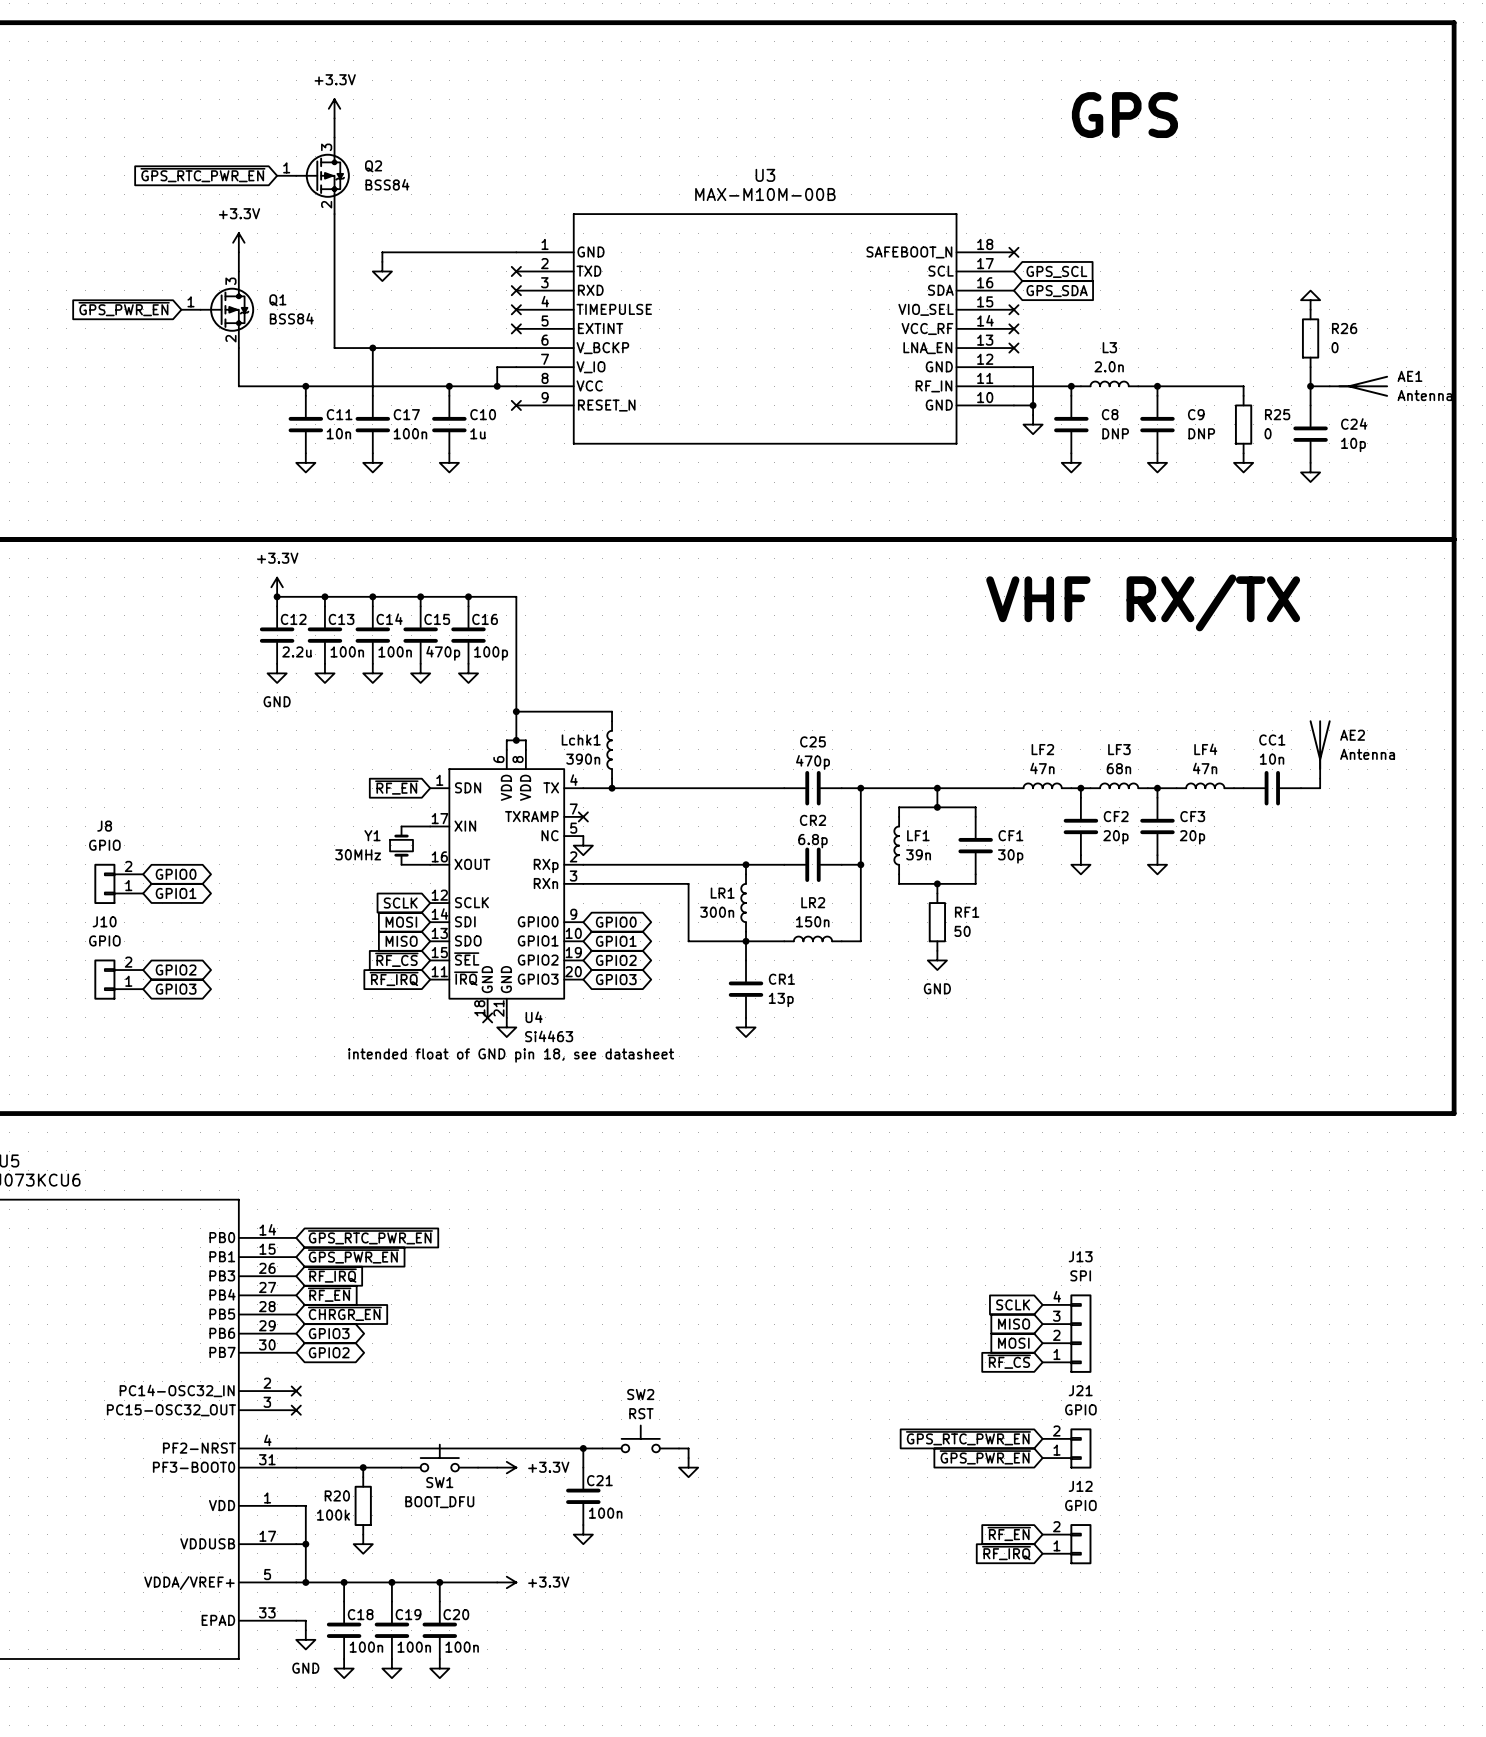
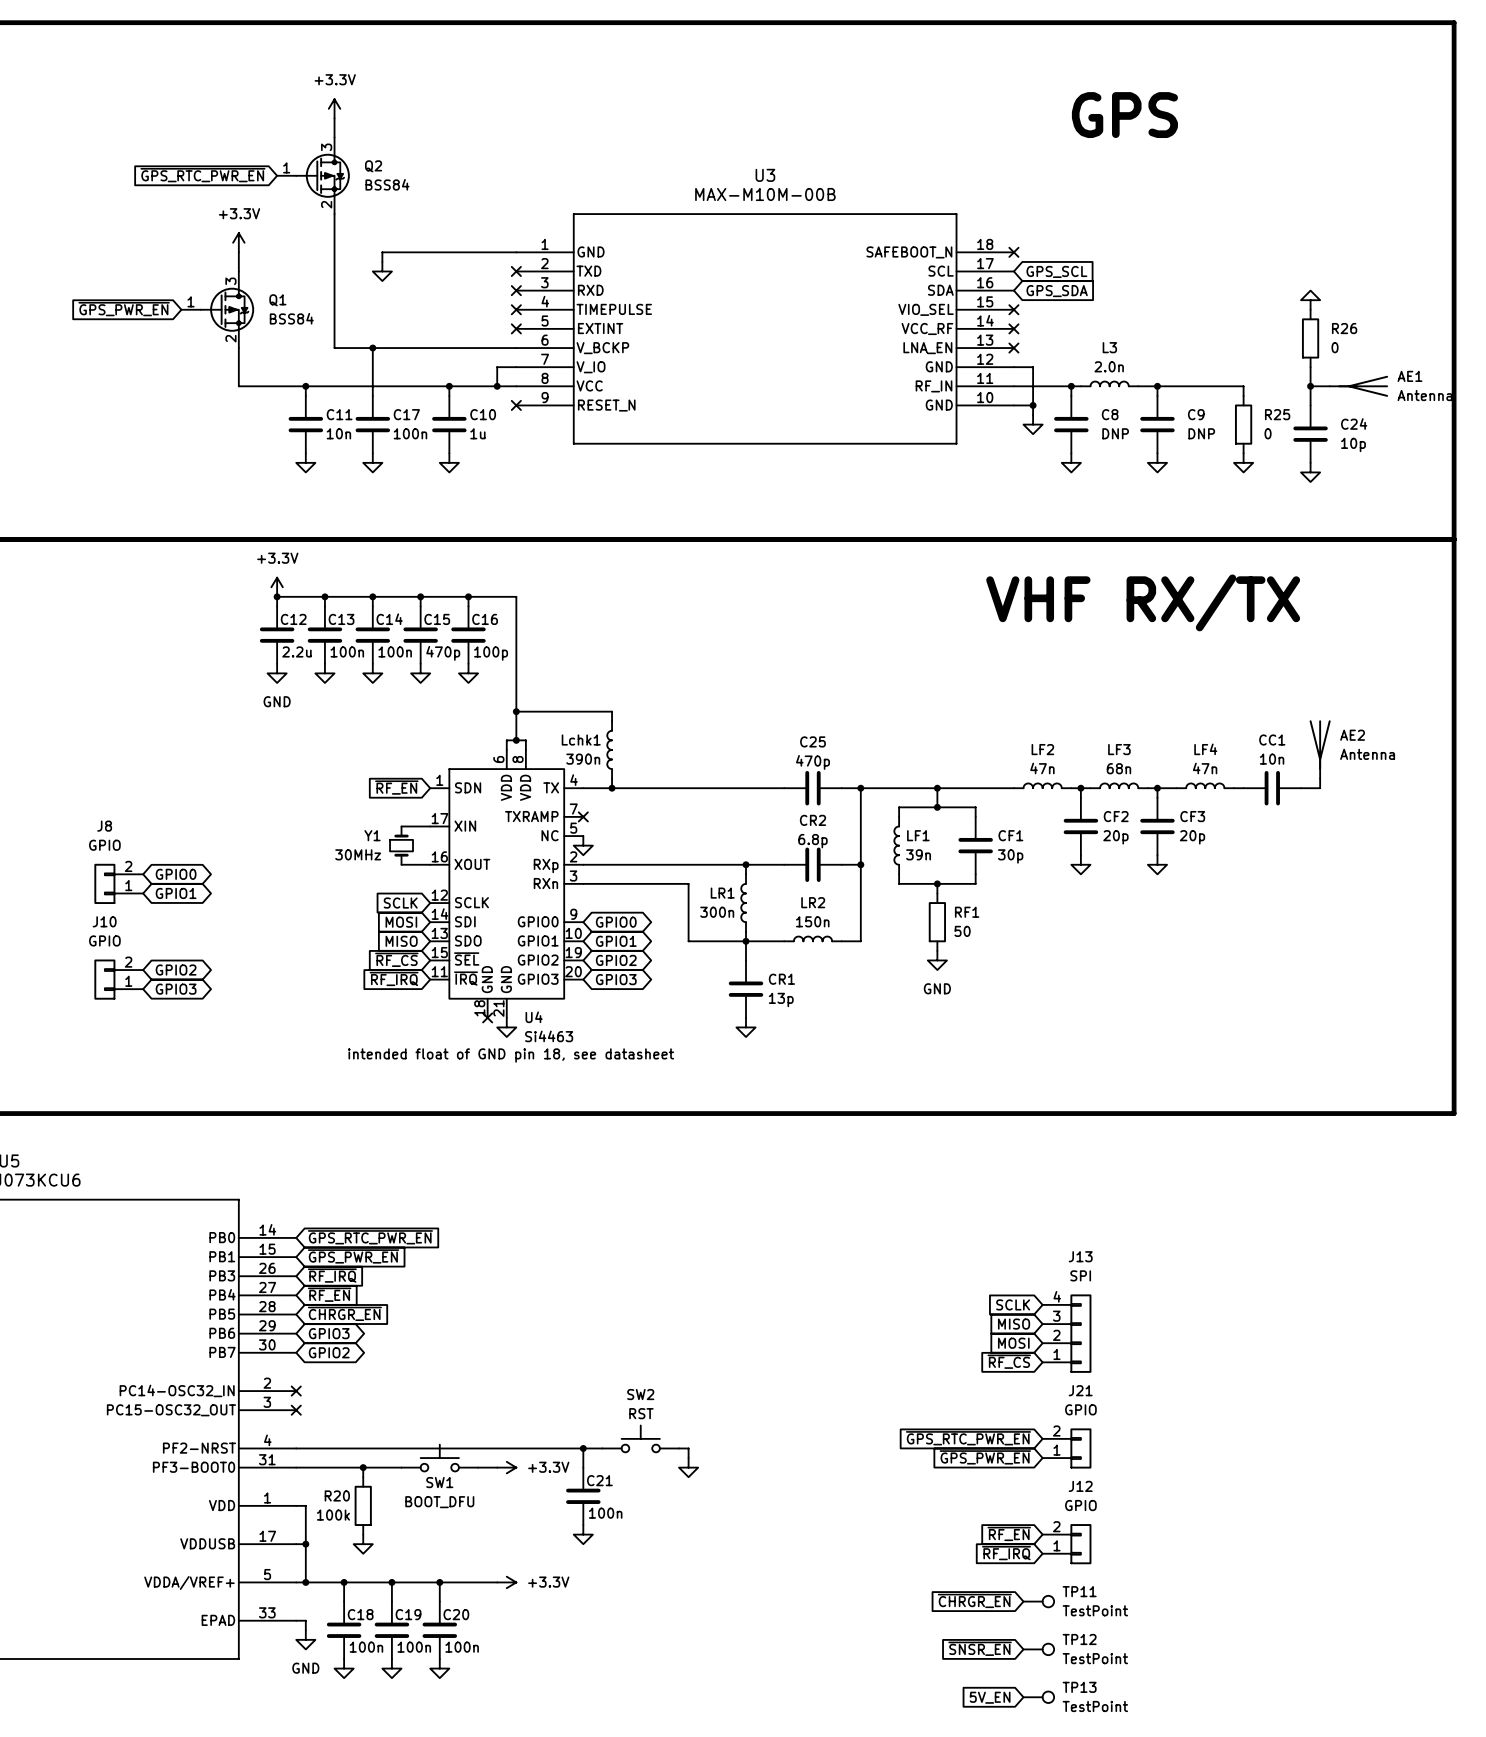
global label: none -> ~{CHRGR_EN} (974, 1600)
TP11: none -> TestPoint (1038, 1601)
global label: none -> ~{SNSR_EN} (980, 1648)
TP12: none -> TestPoint (1038, 1649)
global label: none -> 5V_EN (990, 1697)
TP13: none -> TestPoint (1038, 1697)

